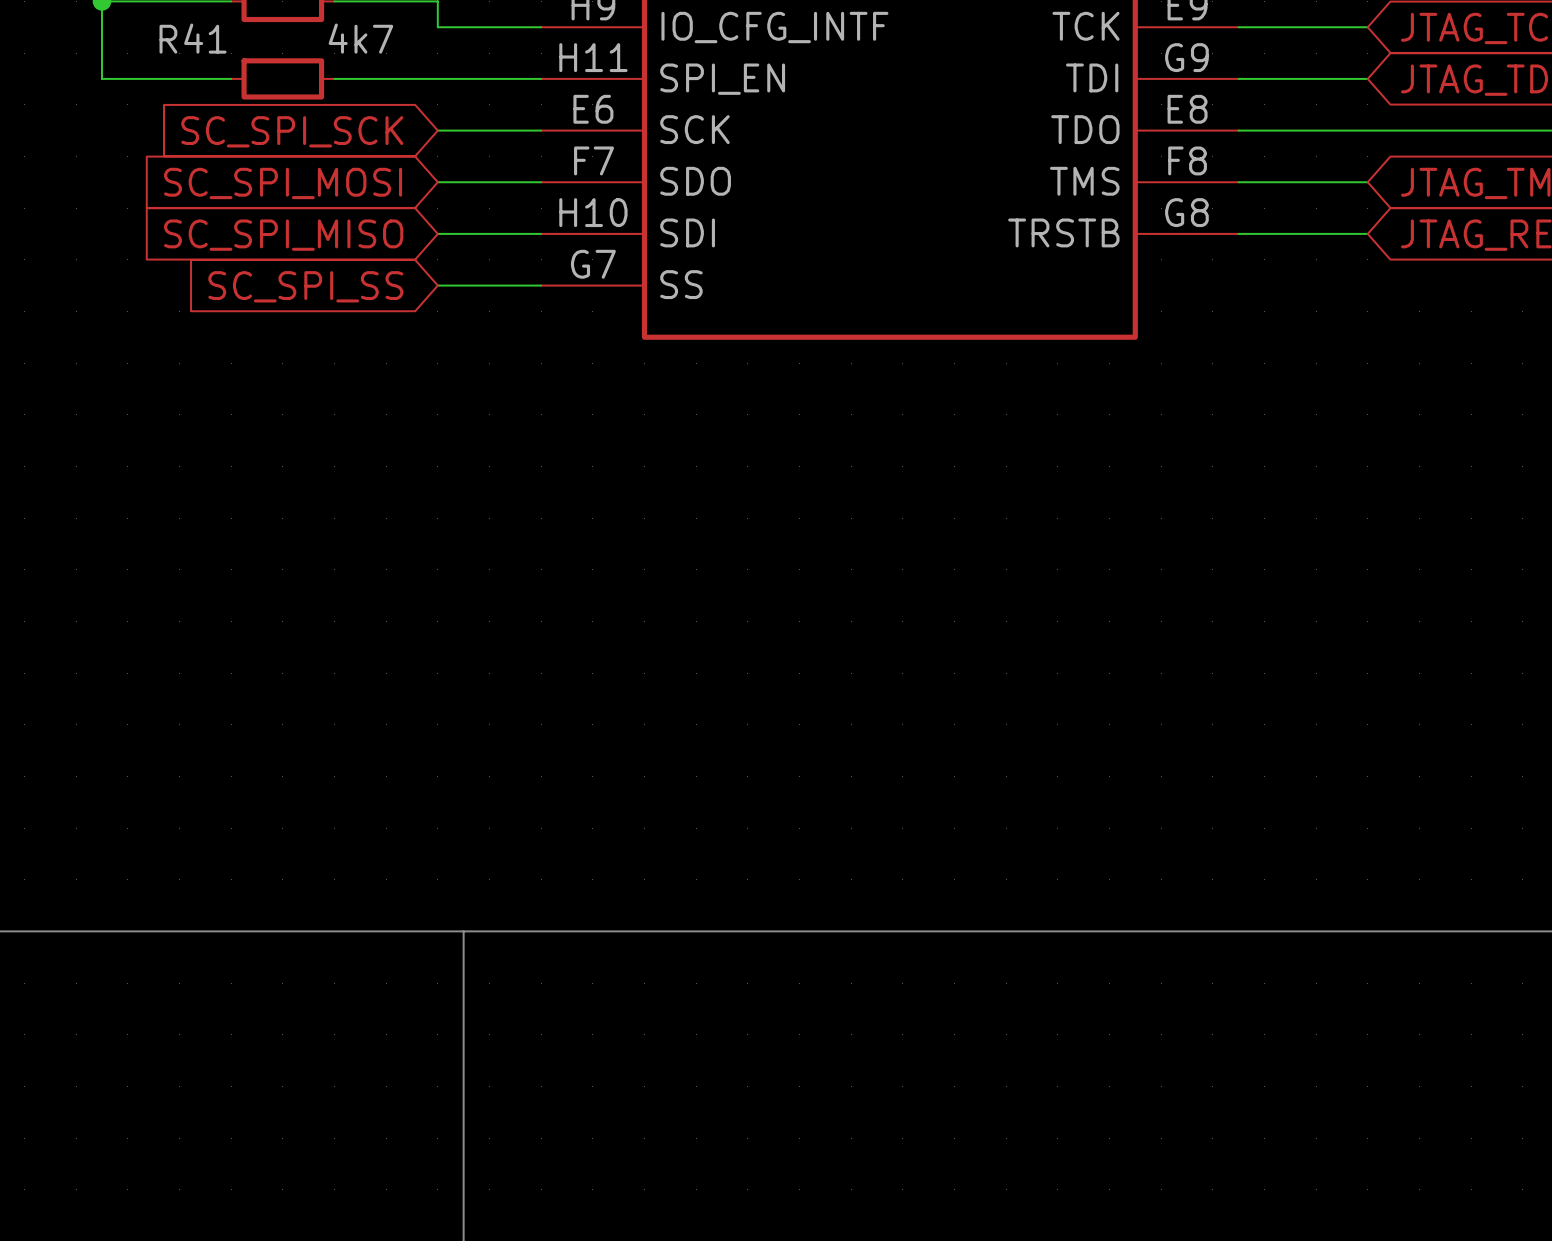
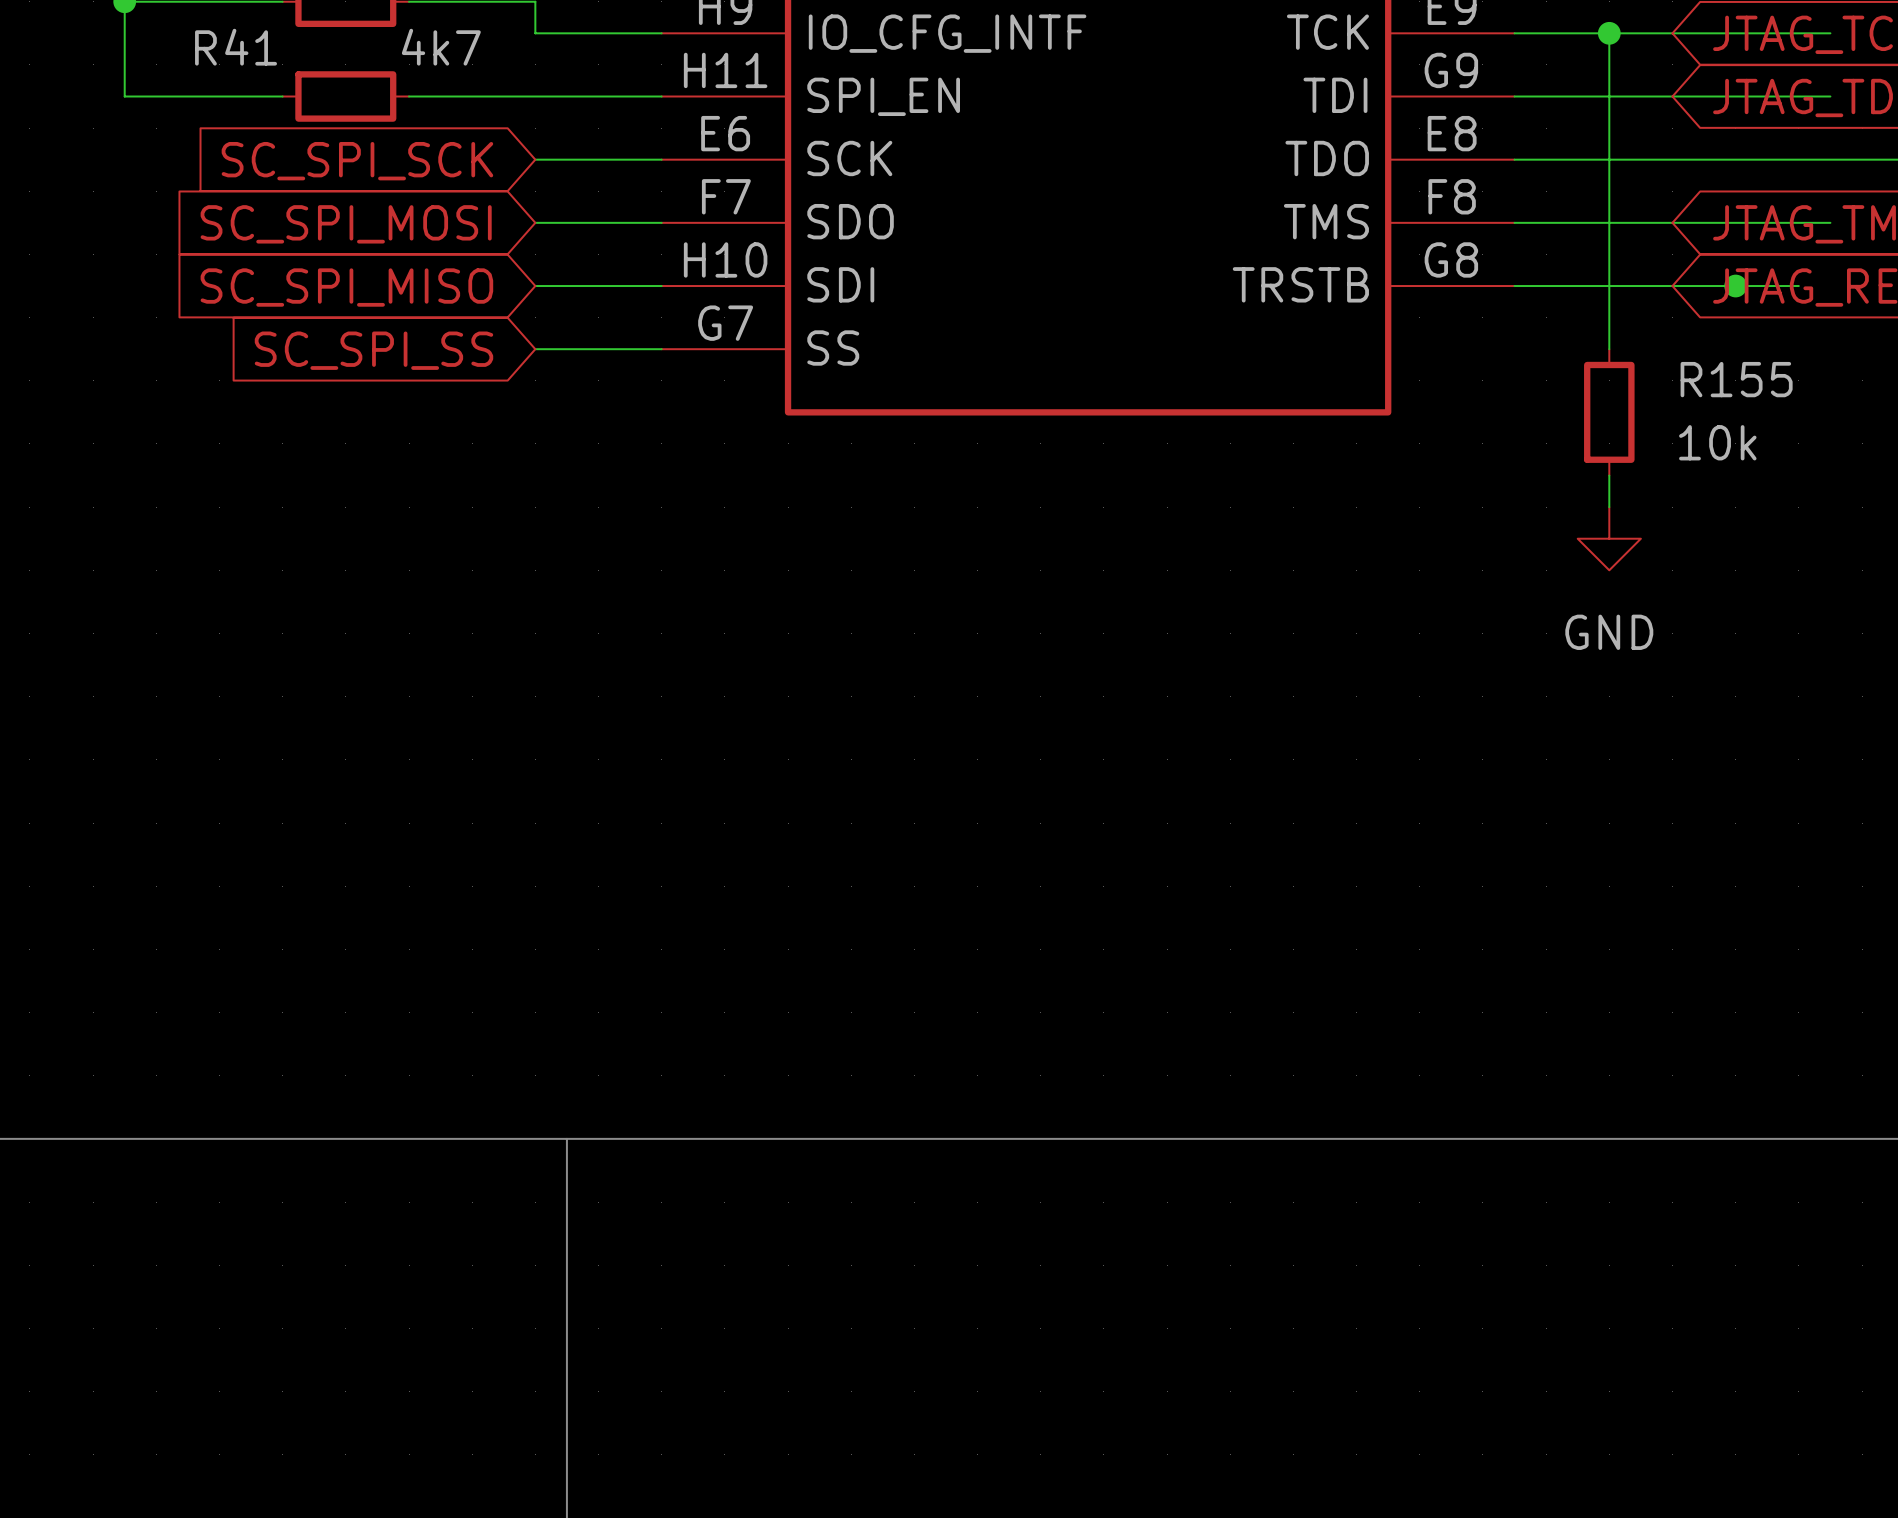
wire: none -> (1609, 33) (1609, 349)
junction: none -> (1609, 33)
wire: none -> (1672, 33) (1830, 33)
wire: none -> (1672, 96) (1830, 96)
wire: none -> (1672, 222) (1830, 222)
wire: none -> (1672, 286) (1798, 286)
junction: none -> (1735, 286)
R155: none -> (1609, 412)
wire: none -> (1609, 475) (1609, 507)
power symbol: none -> GND (1609, 538)

